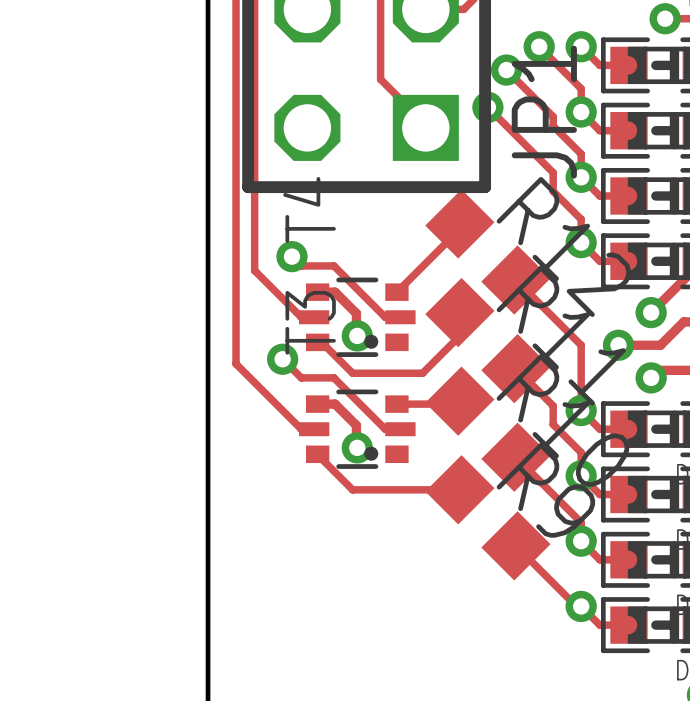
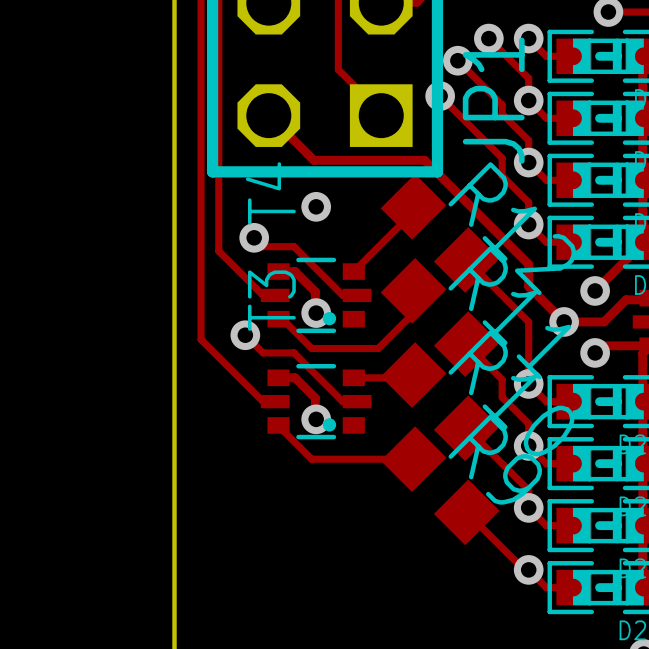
track: none -> (271, 118) (313, 160) (424, 160) (528, 264) (528, 286) (564, 321)
via: none -> (316, 206)

